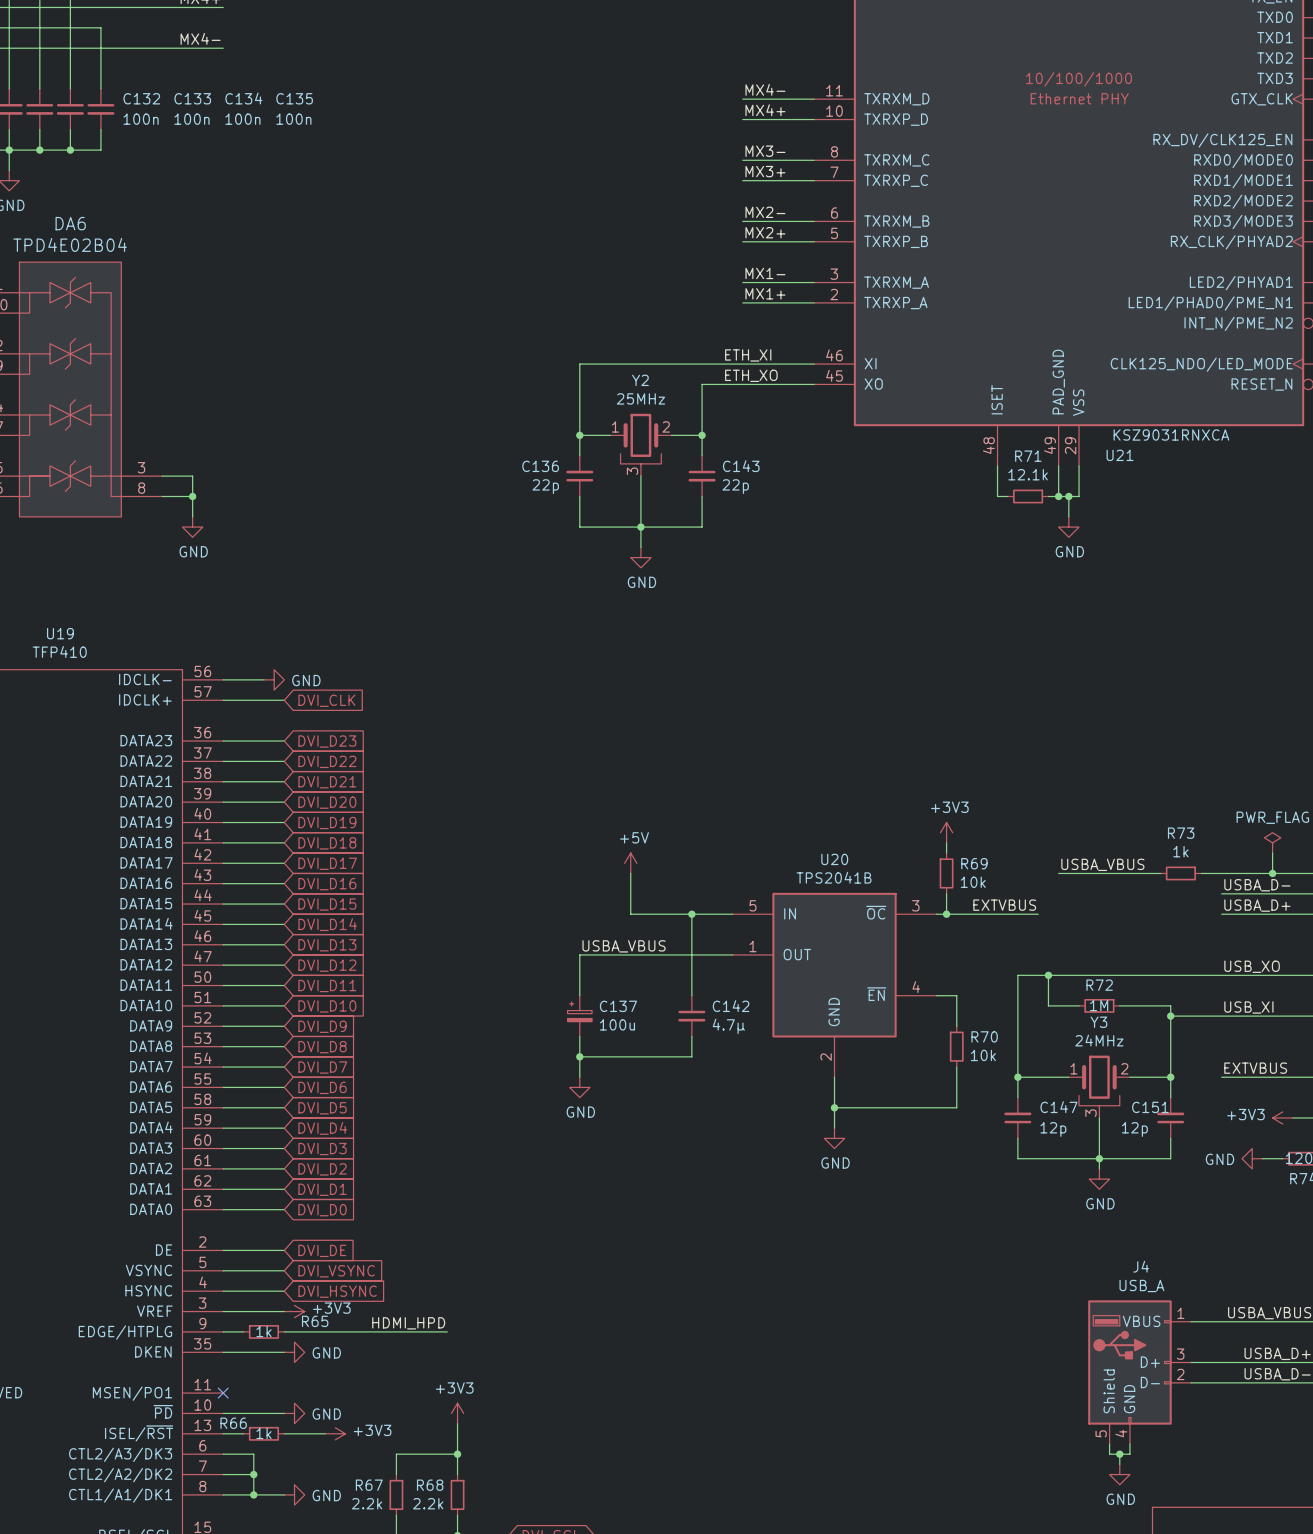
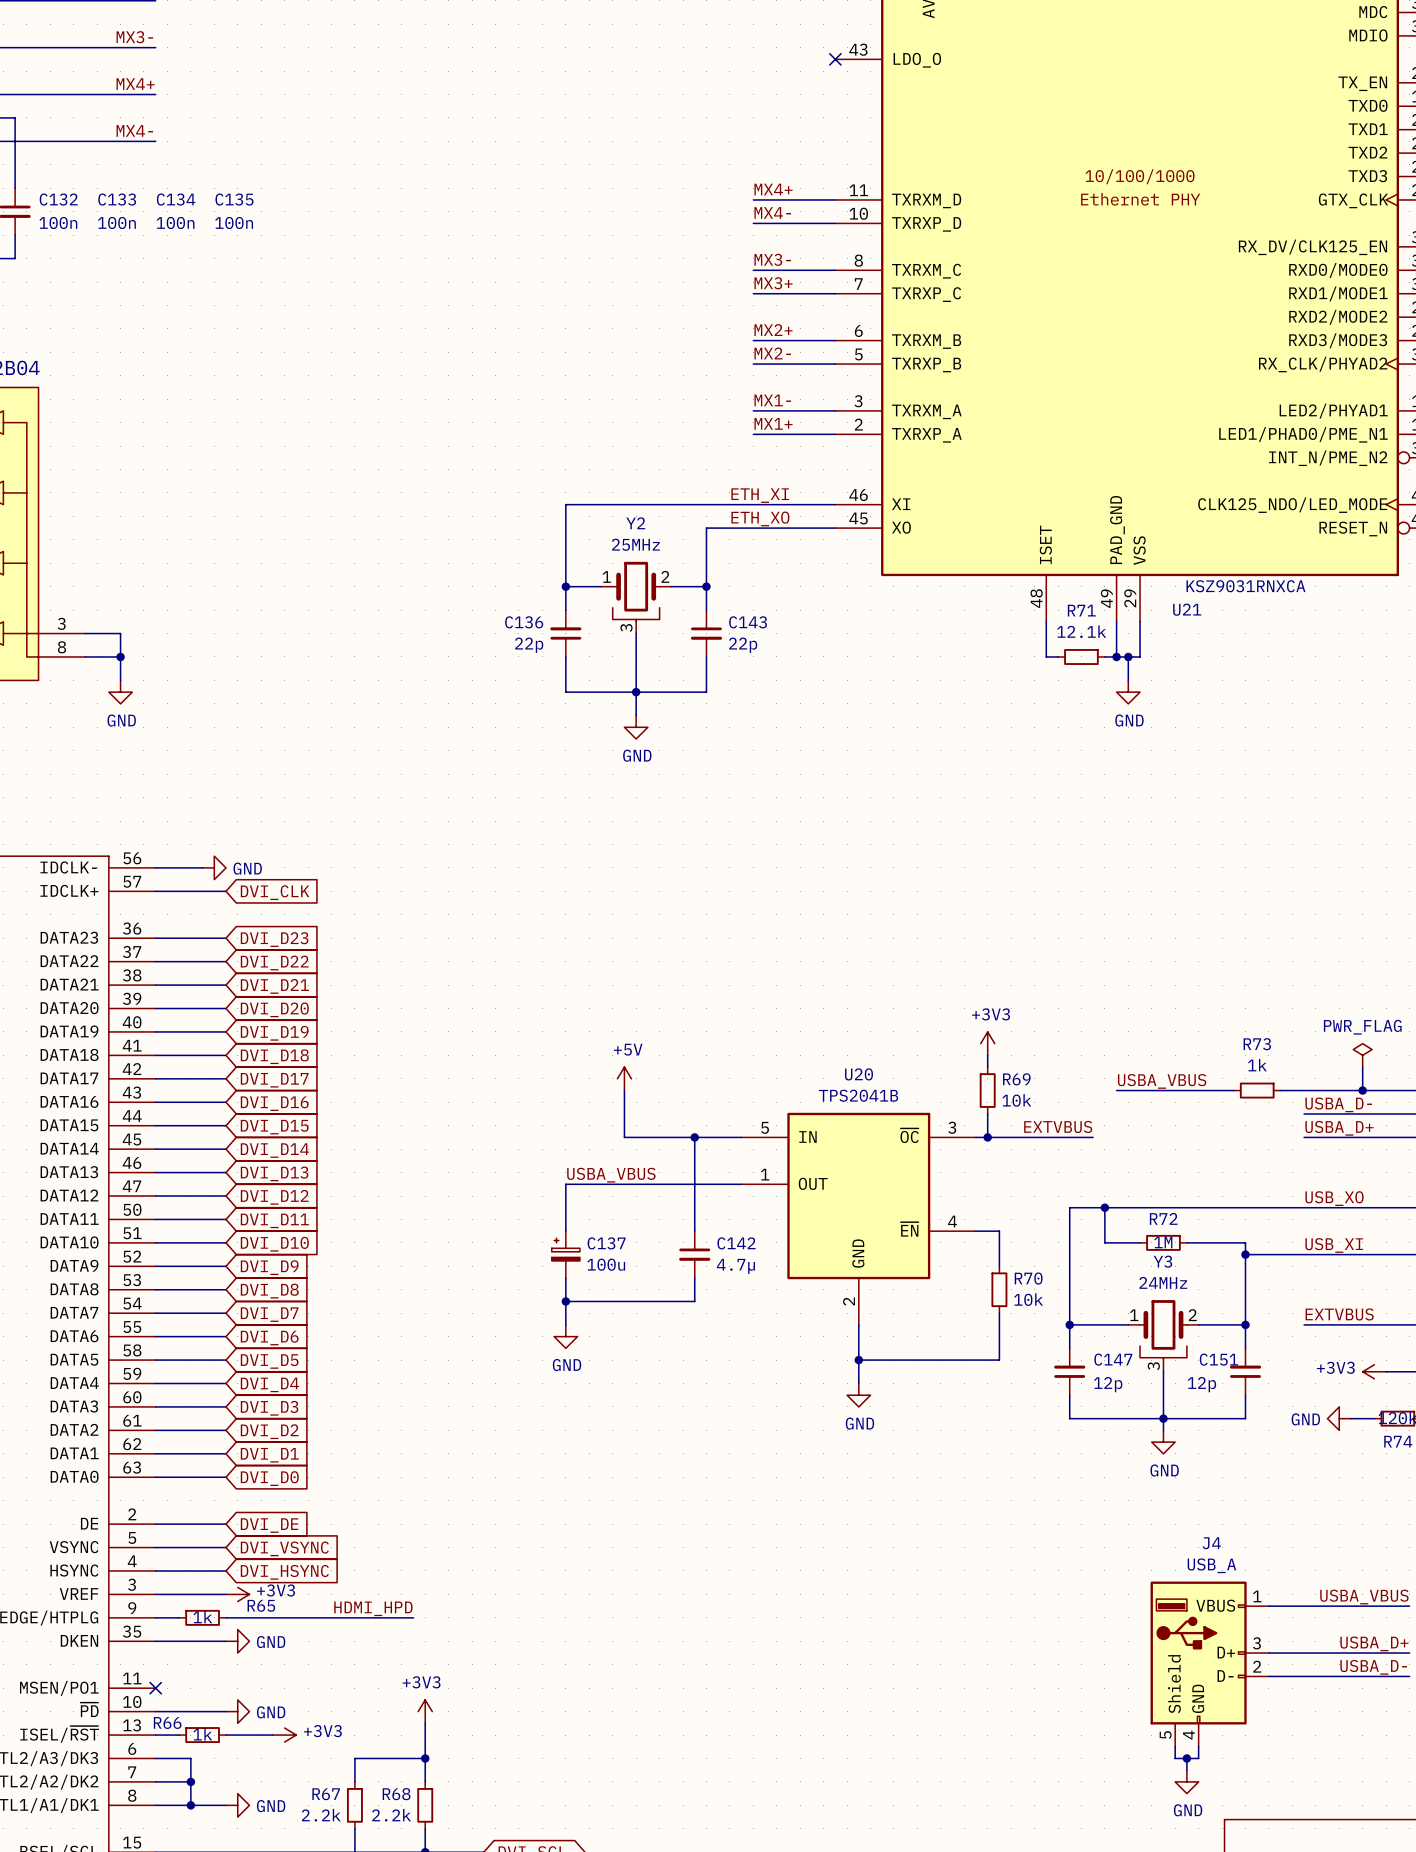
label: MX4- (765, 89) -> MX4+ (773, 189)
label: MX4+ (765, 110) -> MX4- (772, 212)
label: MX2- (765, 212) -> MX2+ (773, 330)
label: MX2+ (765, 232) -> MX2- (772, 353)

